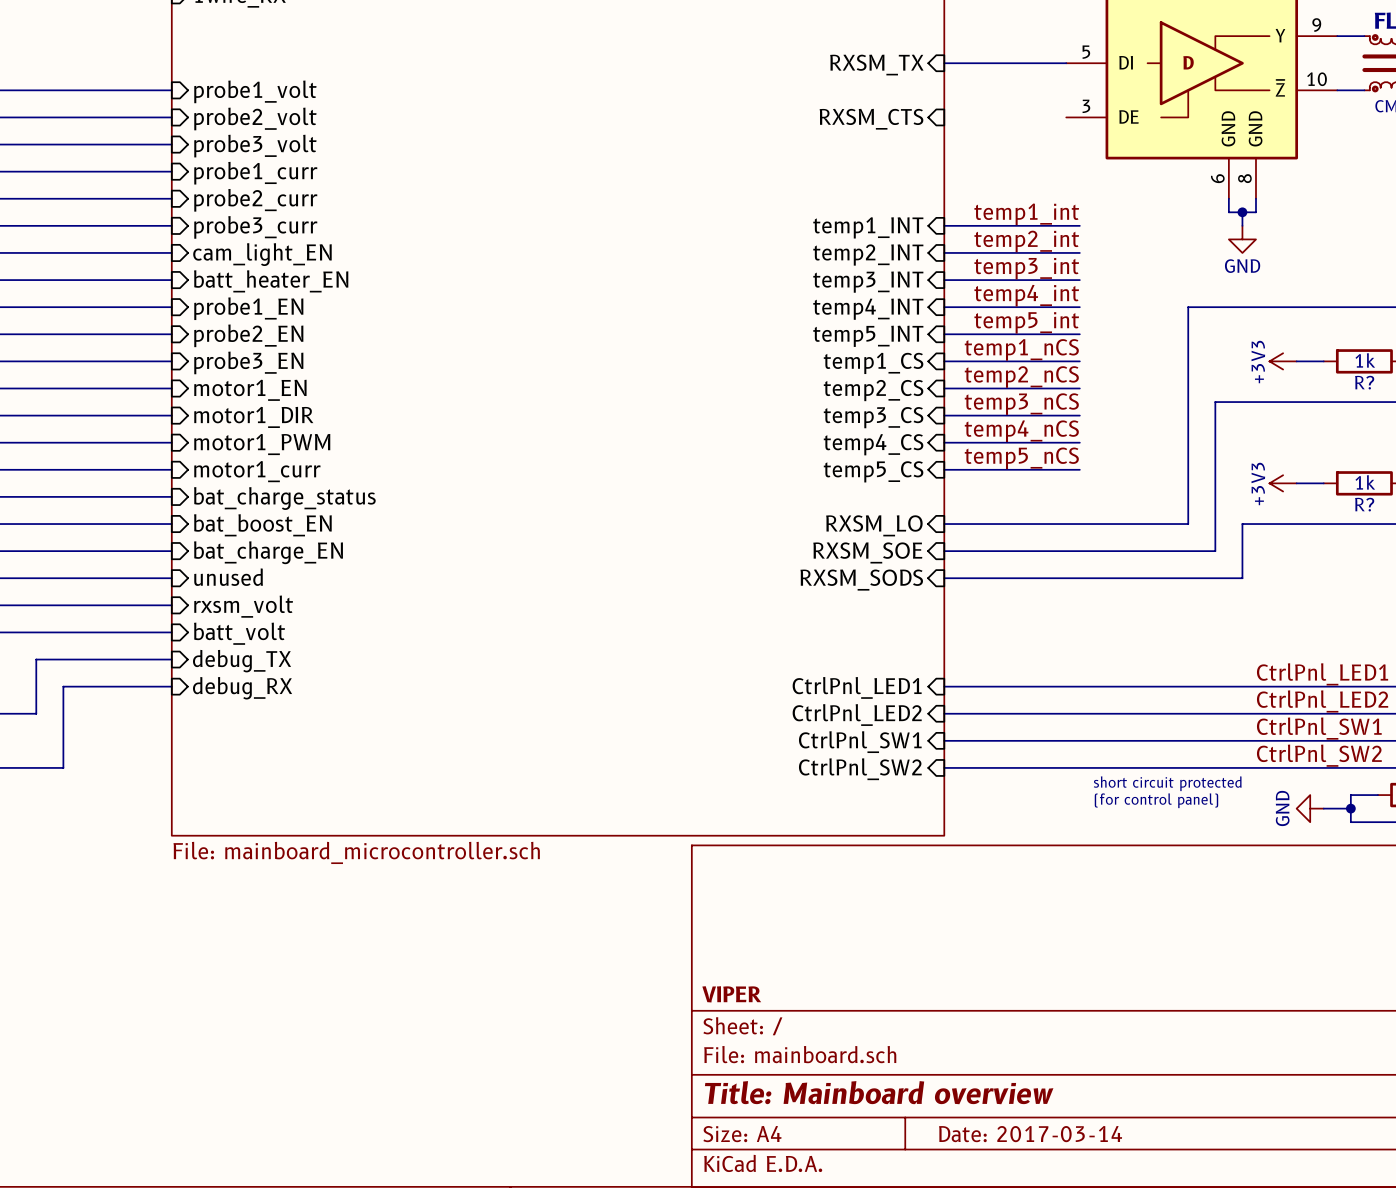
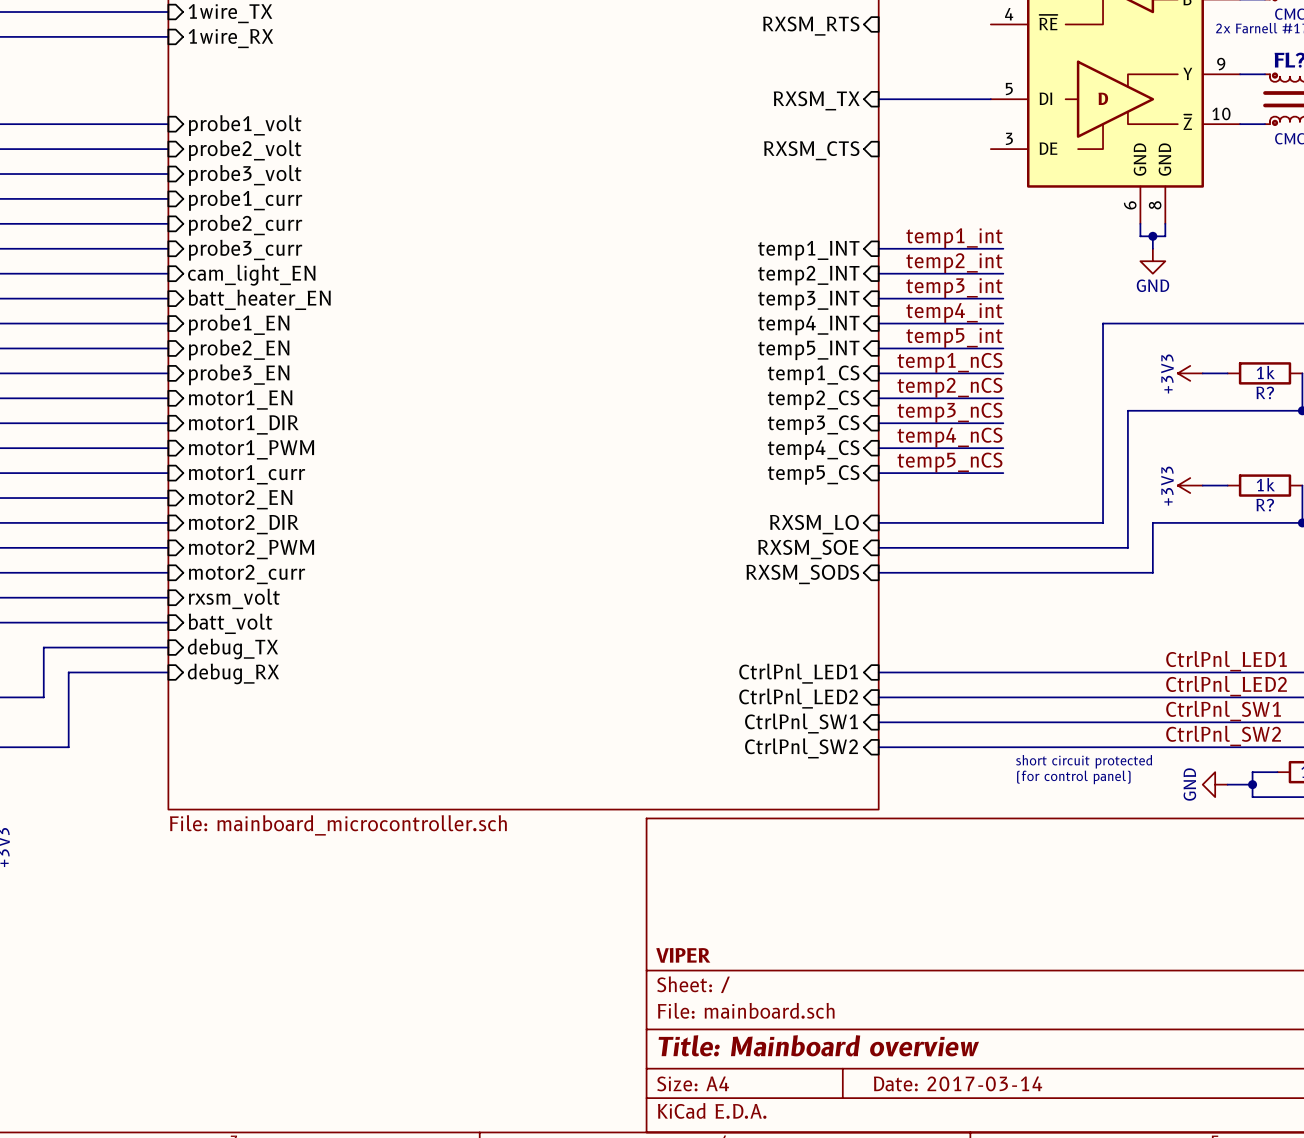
sheet pin: bat_charge_status (284, 498) -> motor2_EN (240, 499)
sheet pin: bat_boost_EN (262, 525) -> motor2_DIR (243, 524)
sheet pin: bat_charge_EN (268, 552) -> motor2_PWM (251, 549)
sheet pin: unused (228, 577) -> motor2_curr (247, 574)

